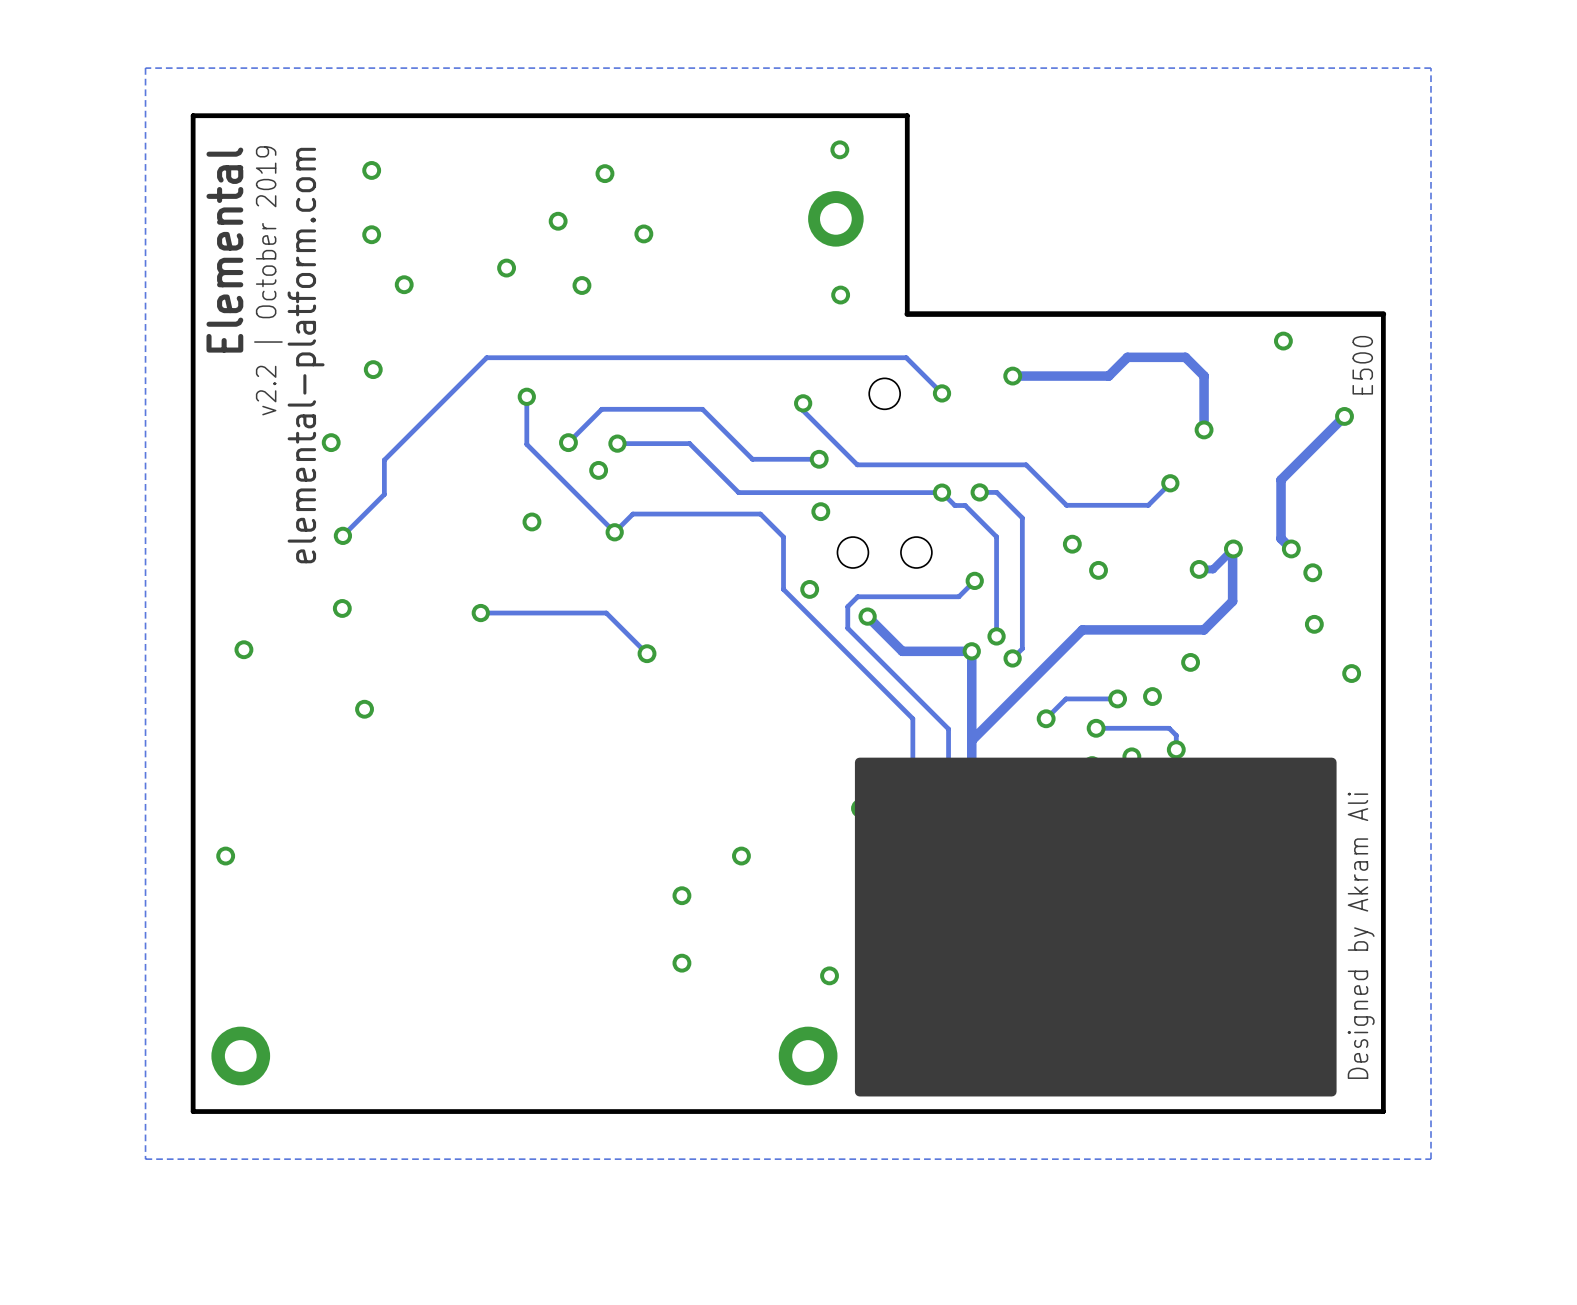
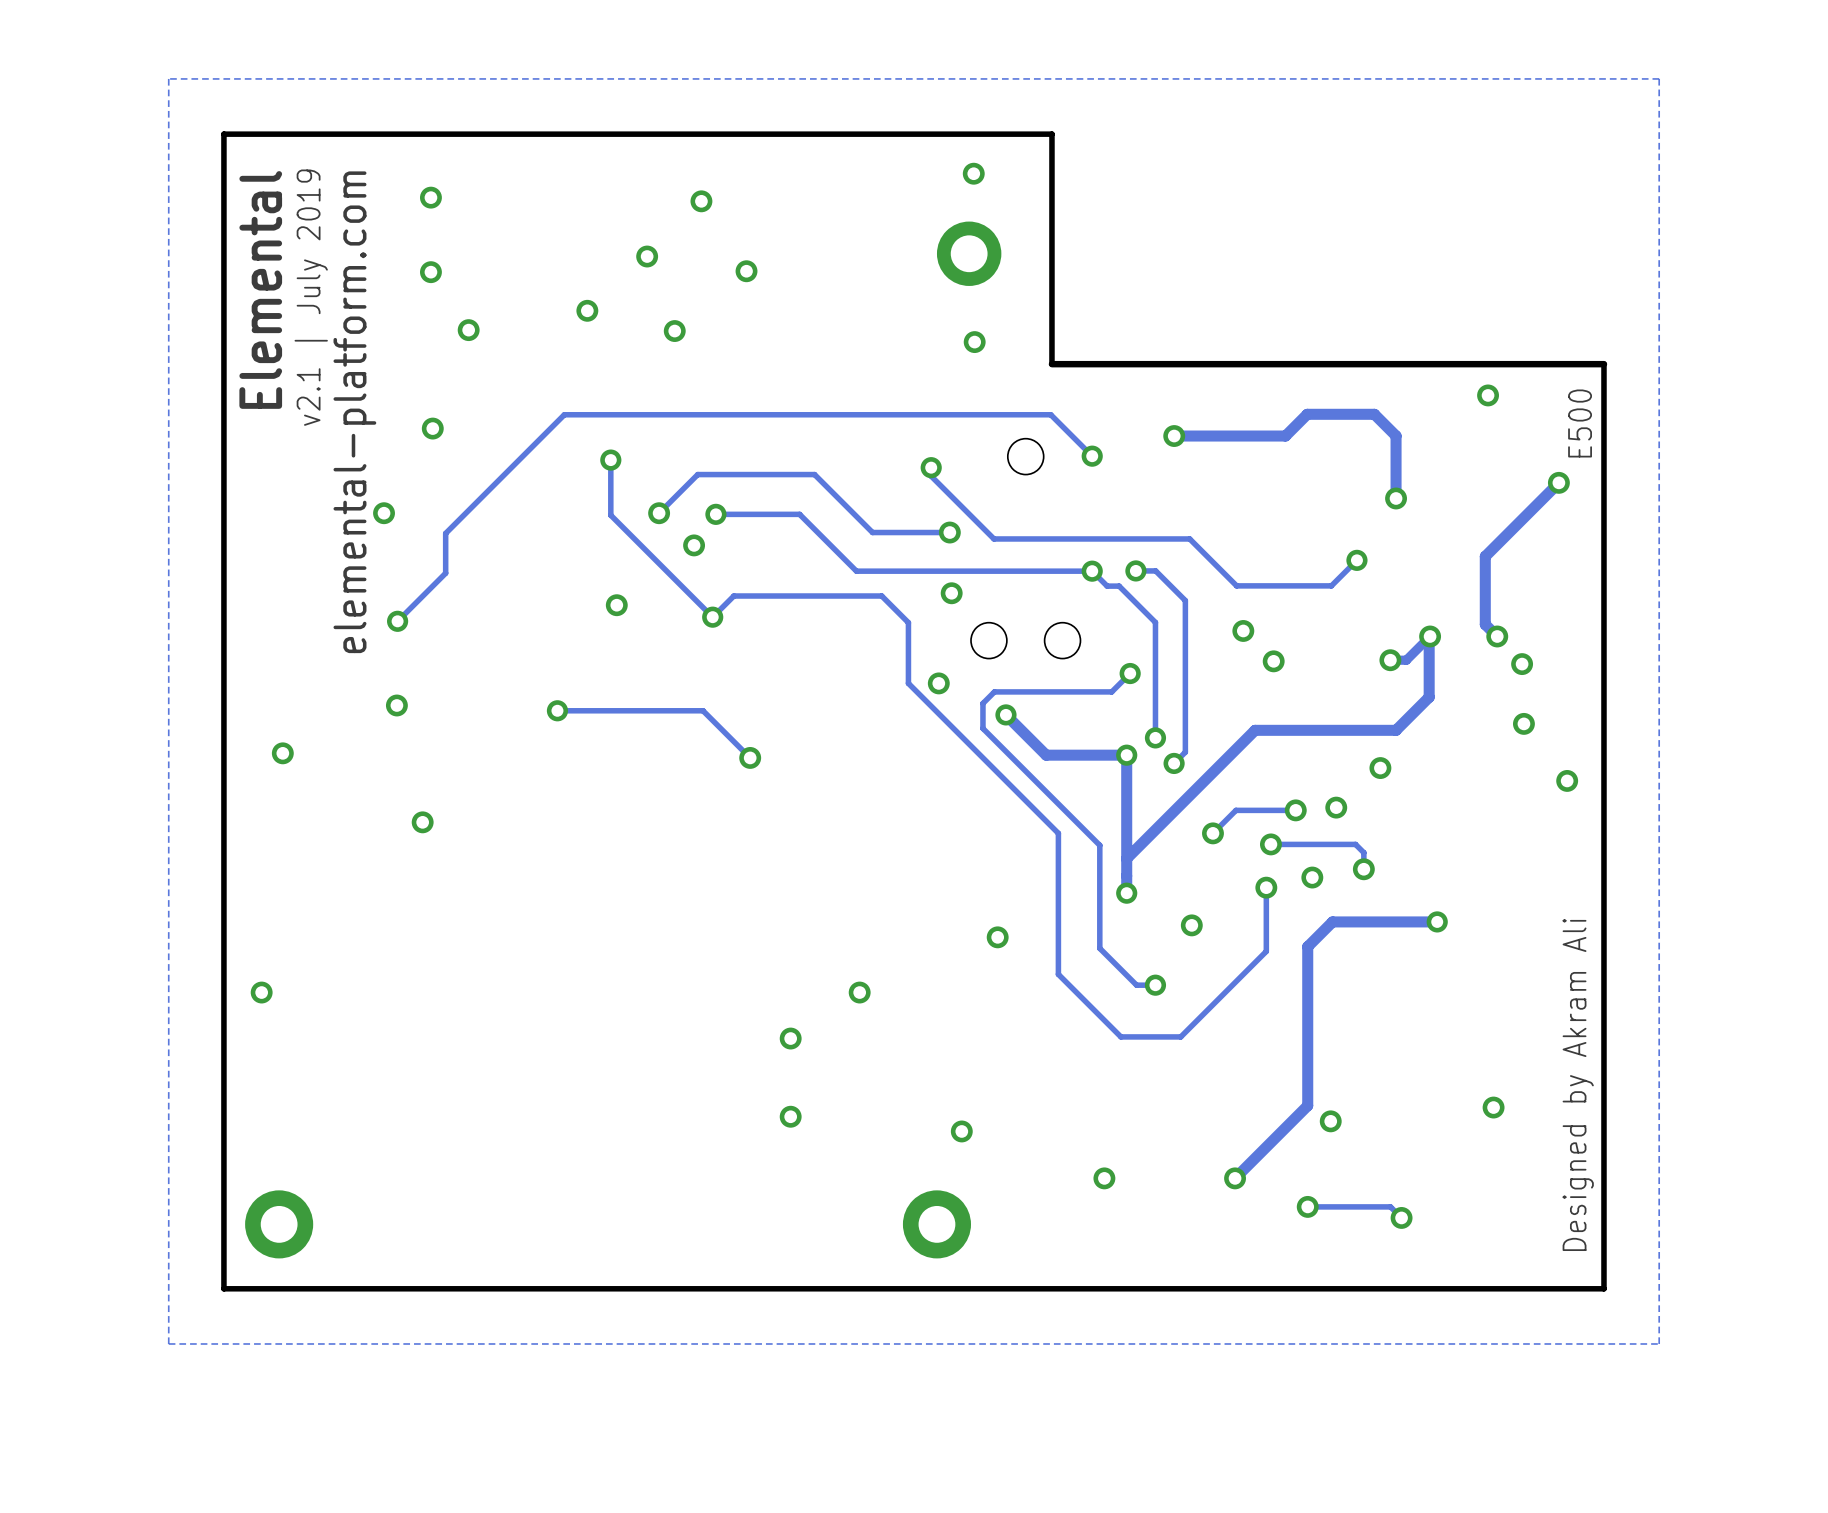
text: v2.2 | October 2019 (268, 280) -> v2.1 | July 2019 (311, 297)
drawing: [854, 757, 1337, 1097] -> none

